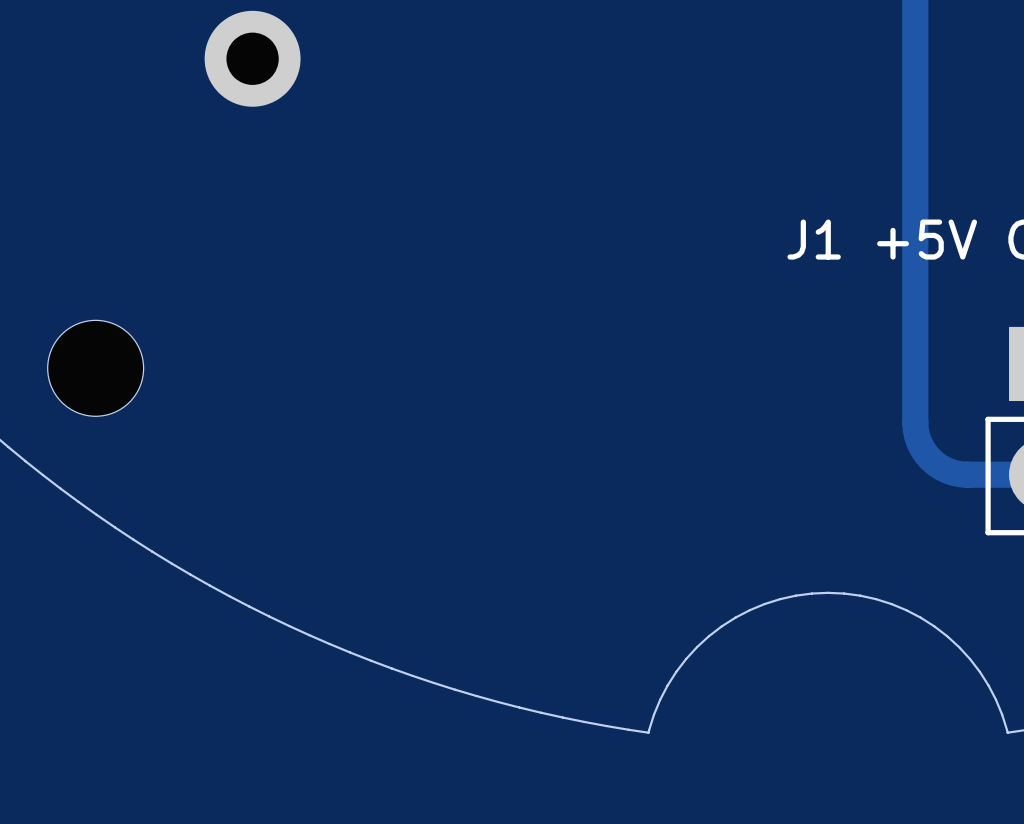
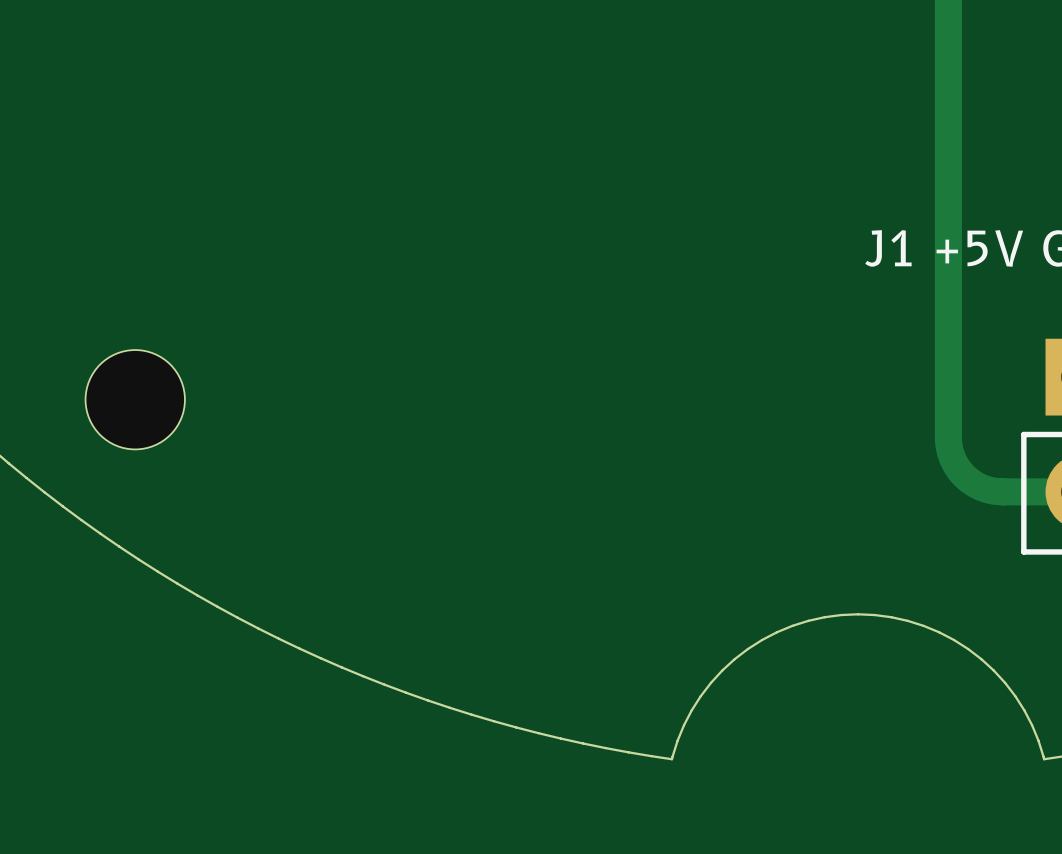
part: (252, 58) -> none
part position: (95, 368) -> (135, 399)

